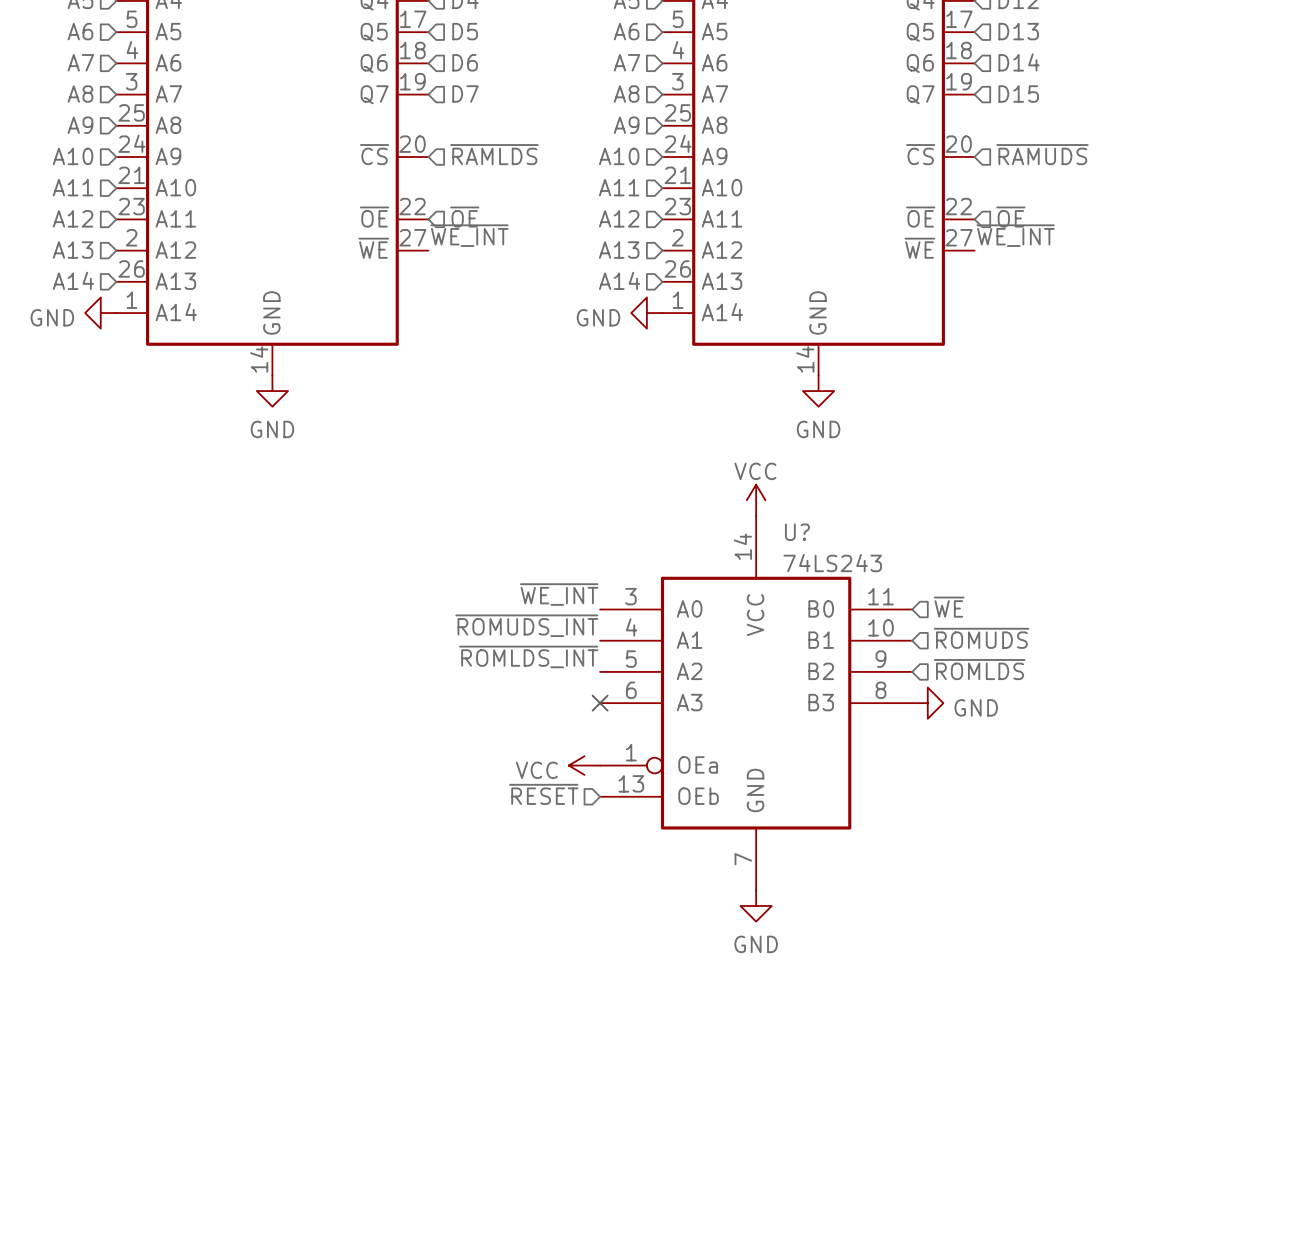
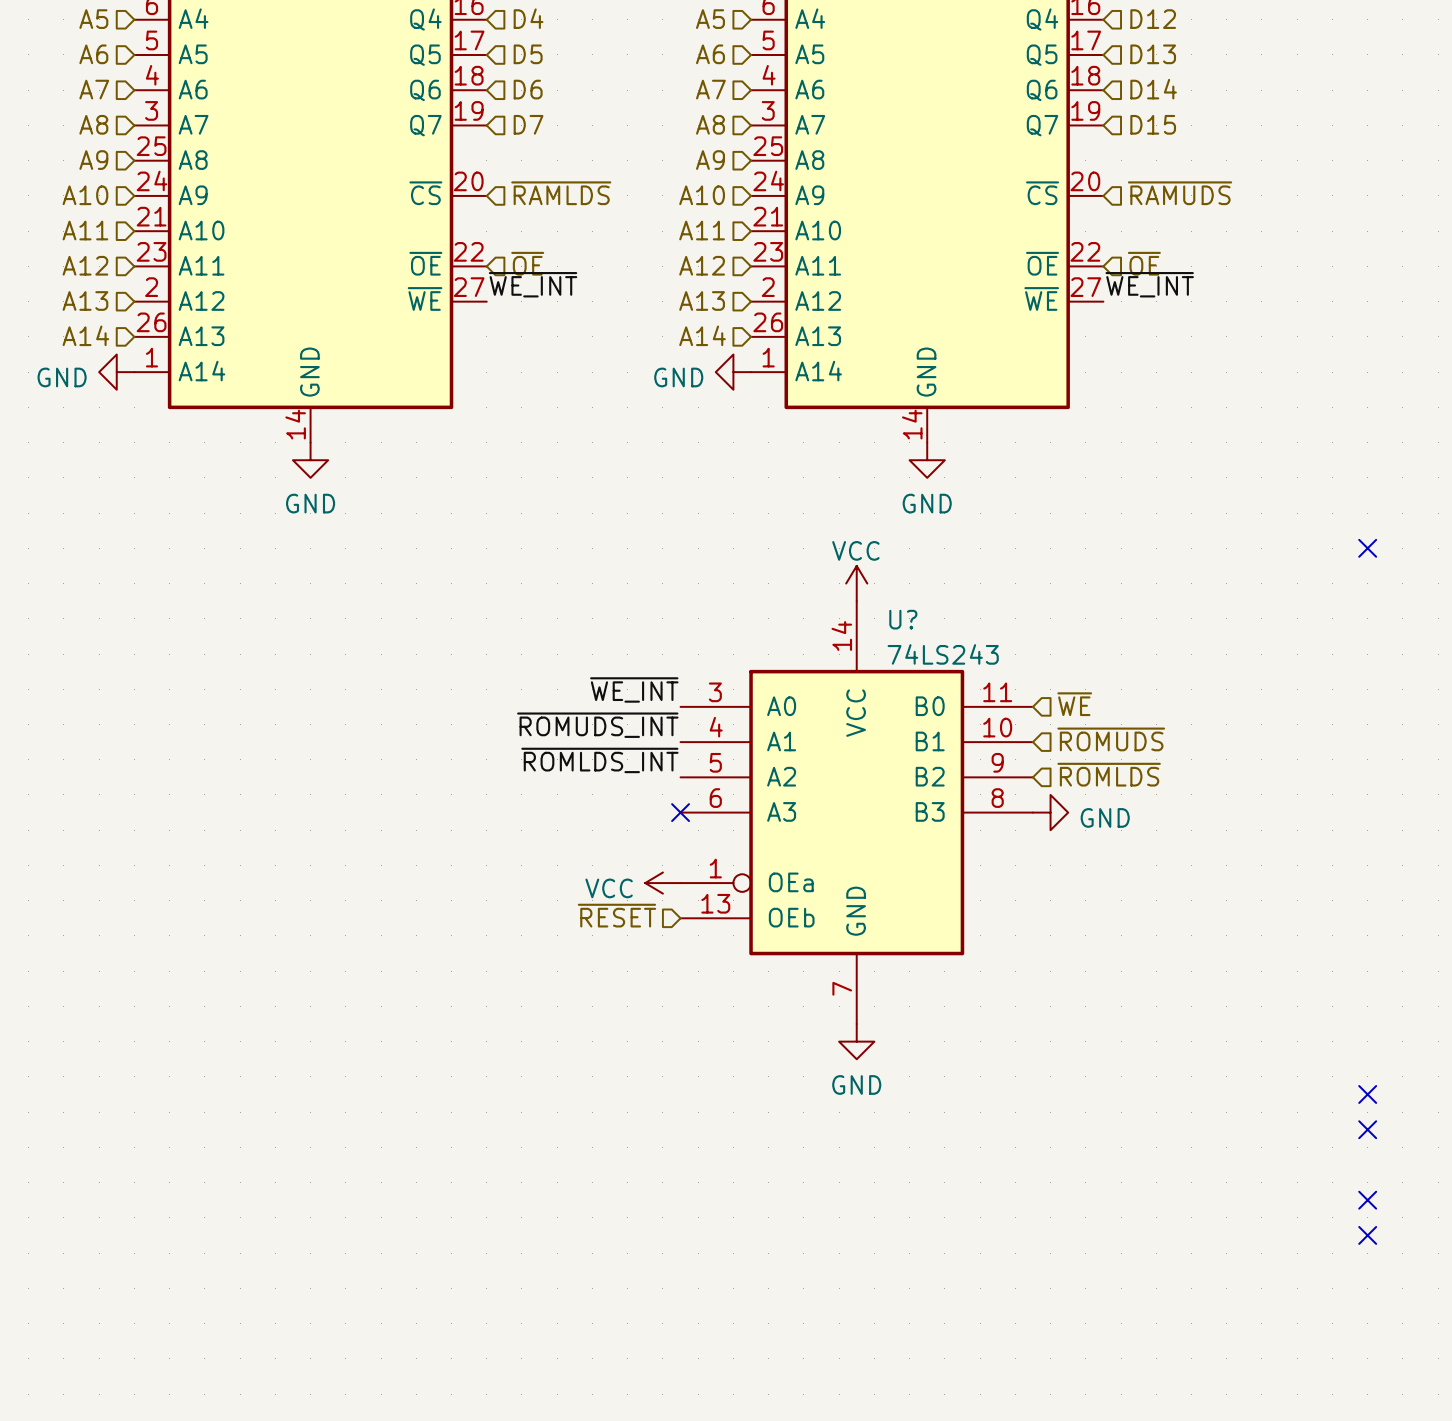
no-connect mark: none -> (1367, 548)
no-connect mark: none -> (1367, 1094)
no-connect mark: none -> (1367, 1129)
no-connect mark: none -> (1367, 1200)
no-connect mark: none -> (1367, 1235)

